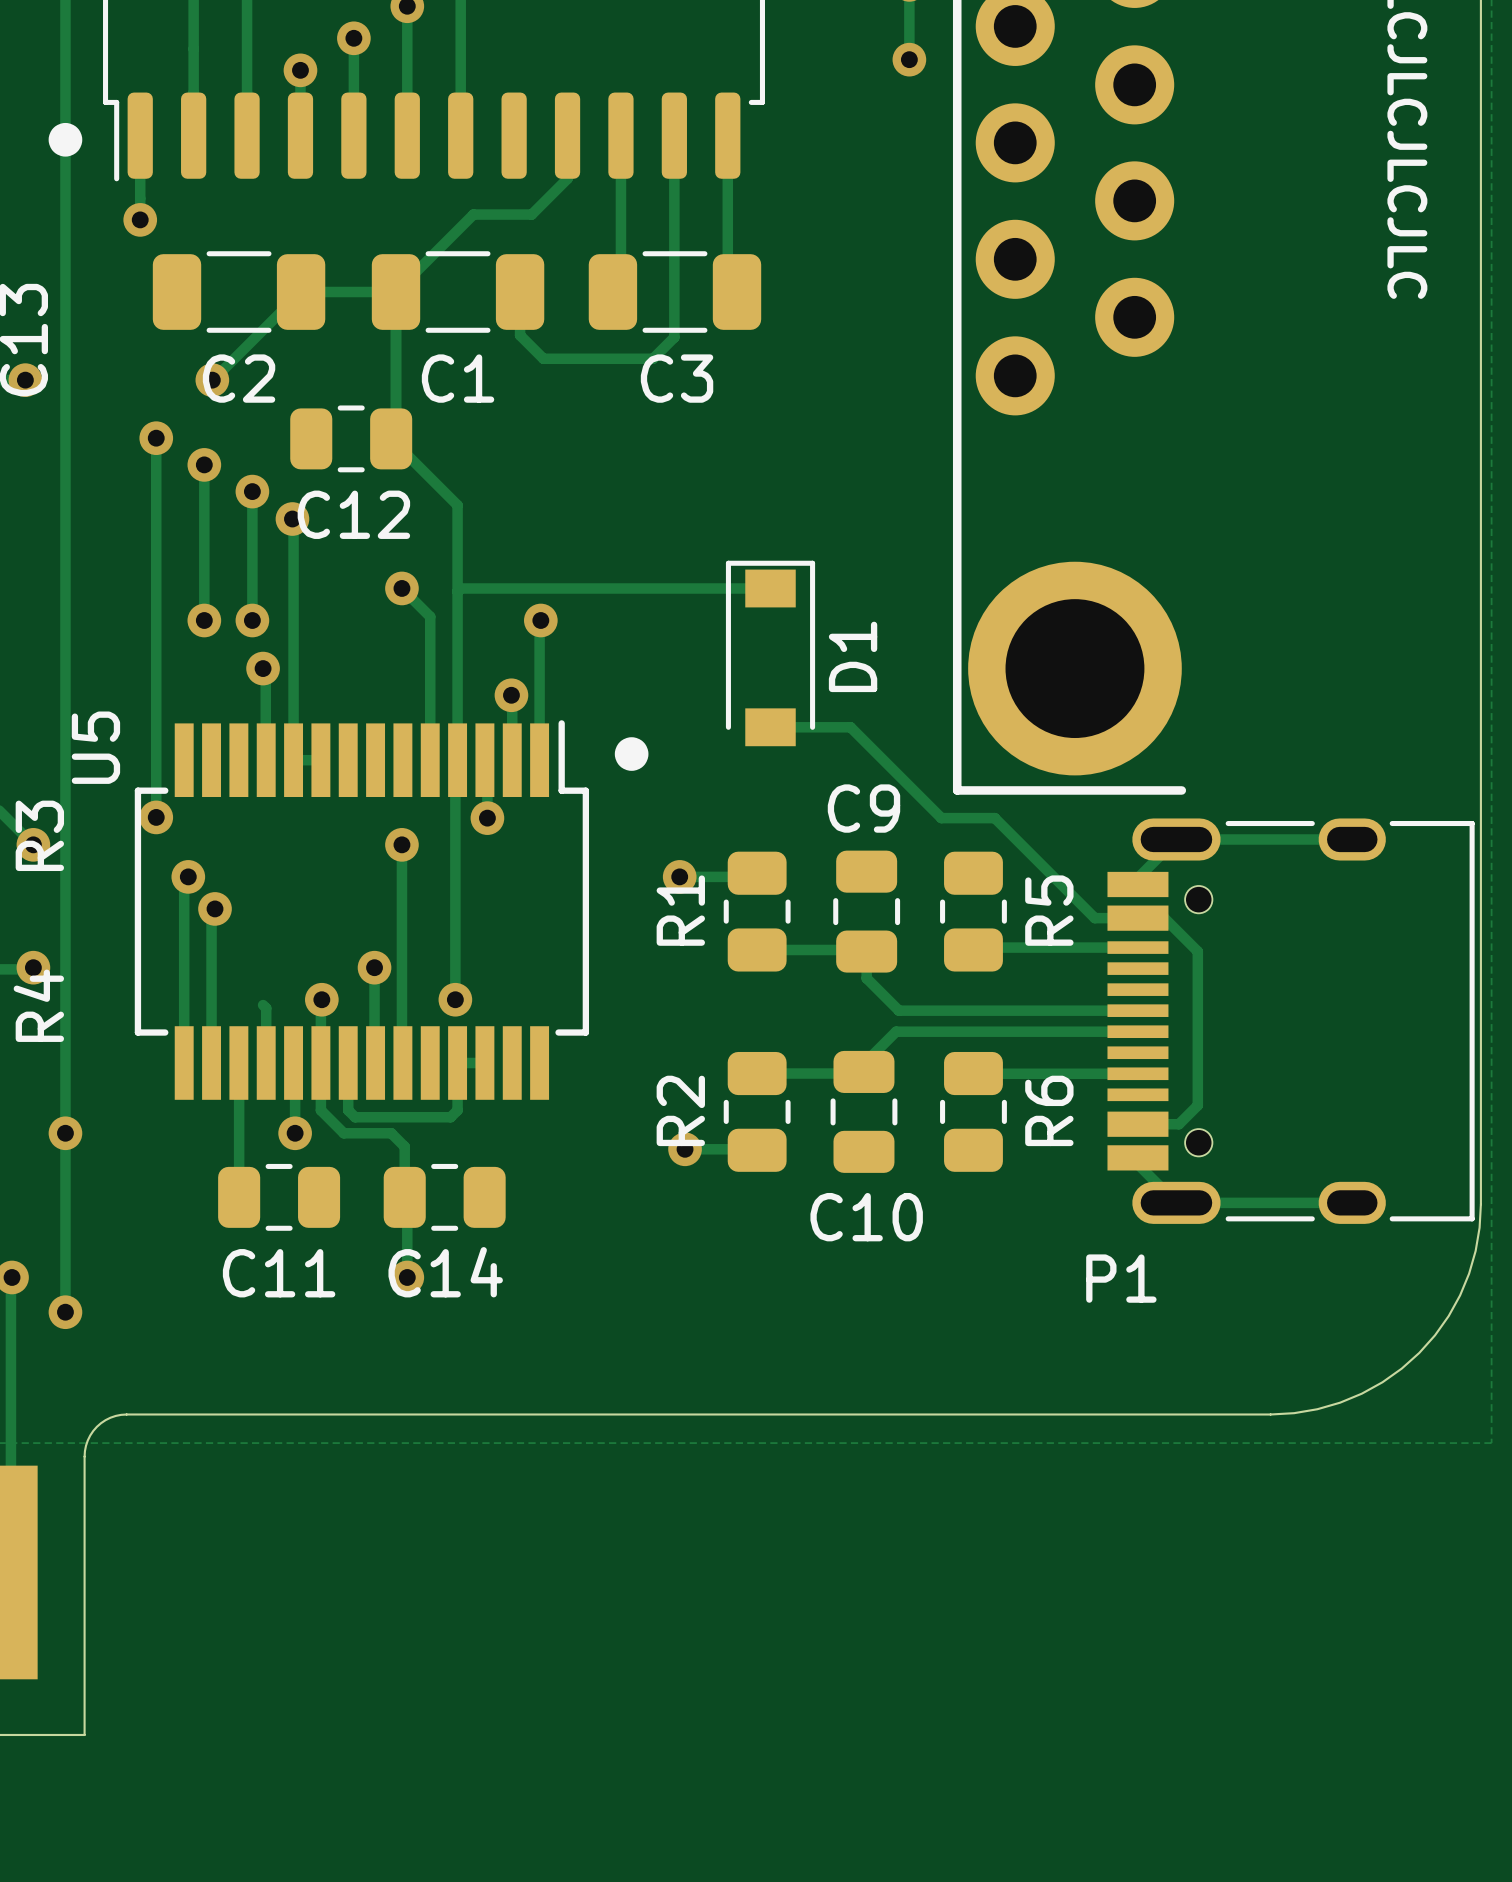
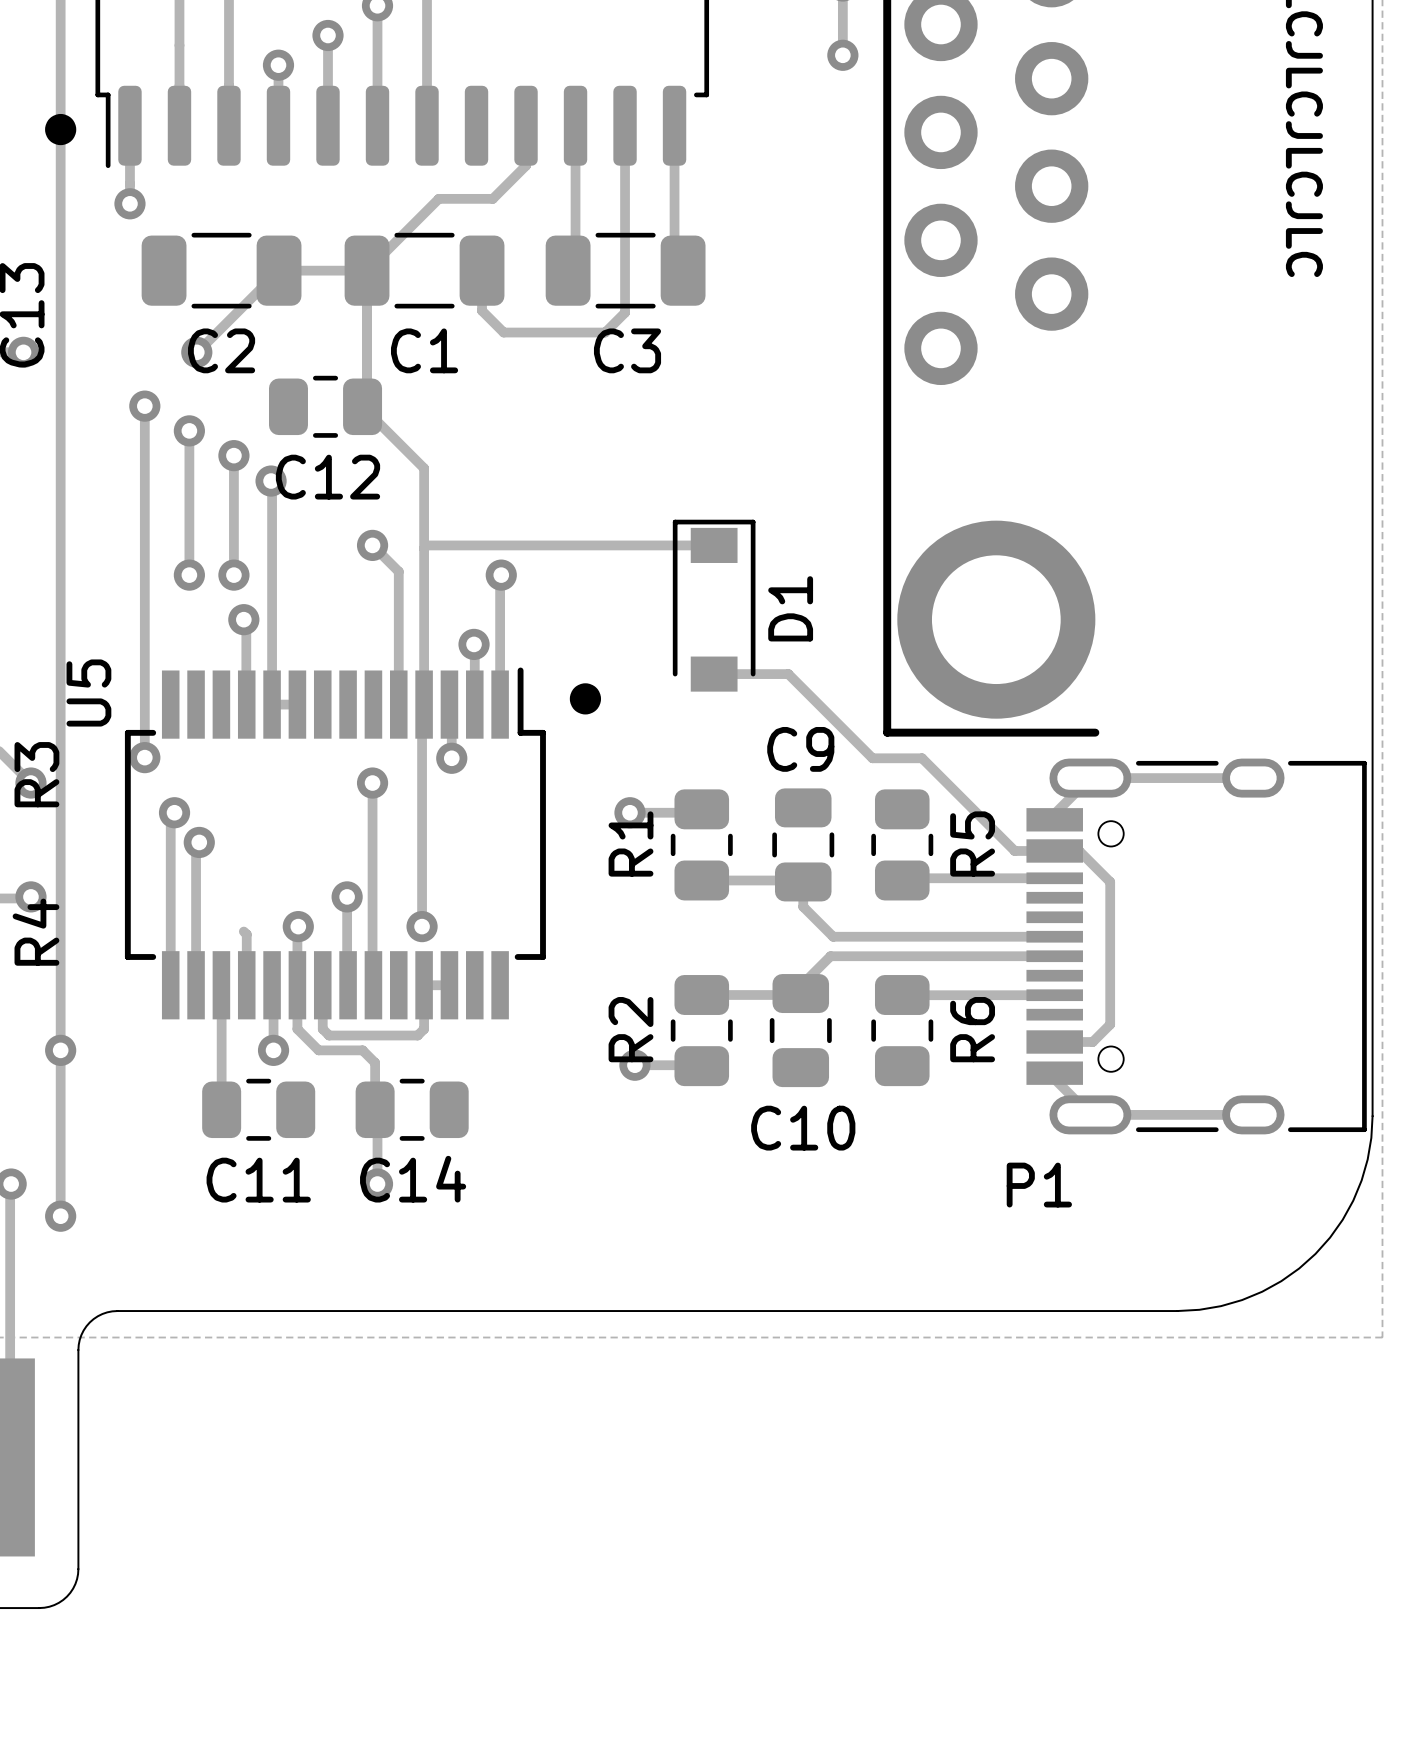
board edge: (84, 1692) (84, 1734) (42, 1734) -> (78, 1569) (75, 1583) (66, 1596) (54, 1605) (39, 1608)

